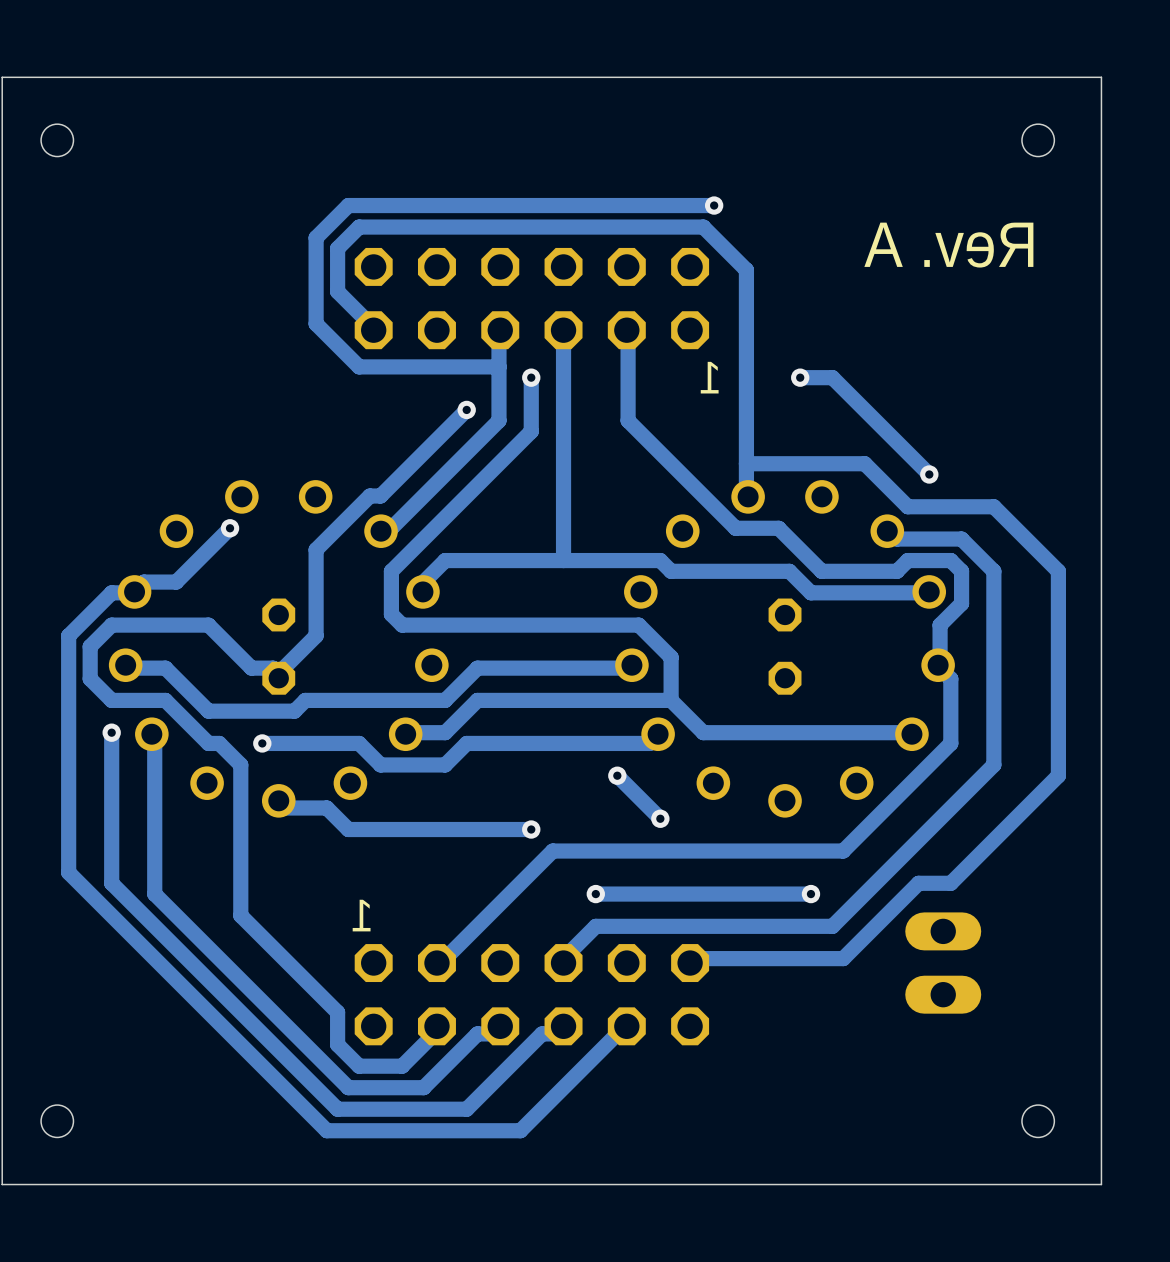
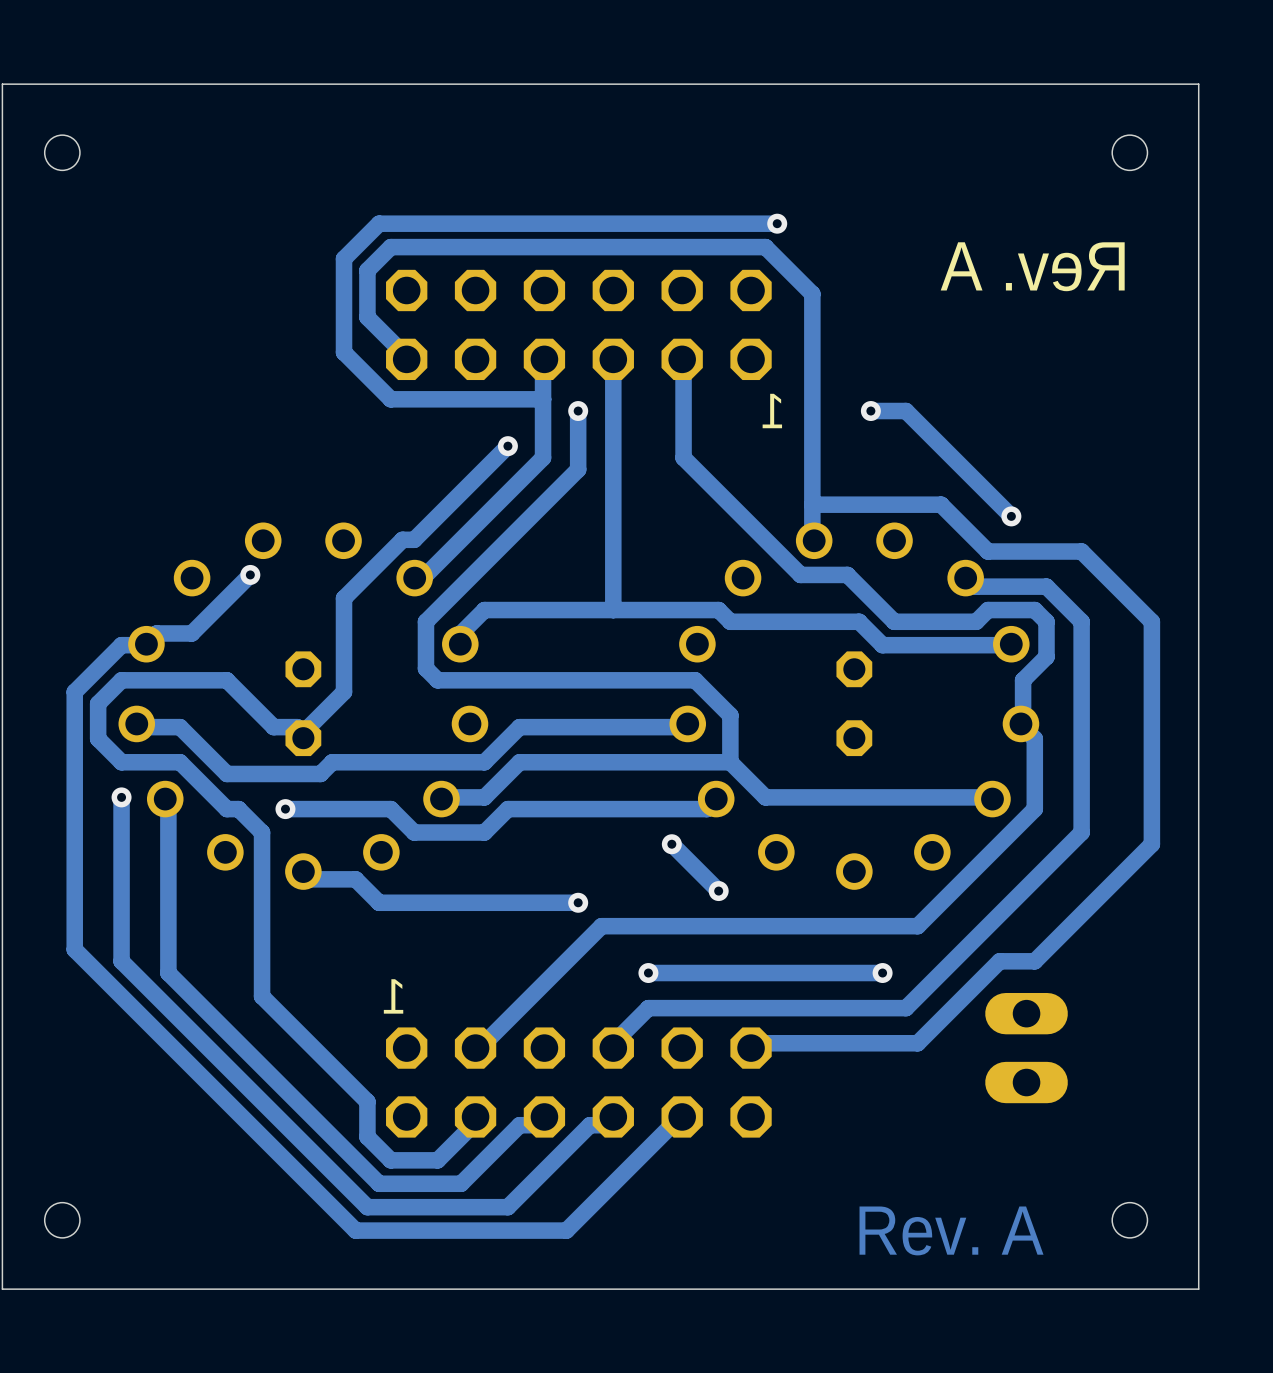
text: none -> Rev. A (951, 1230)

